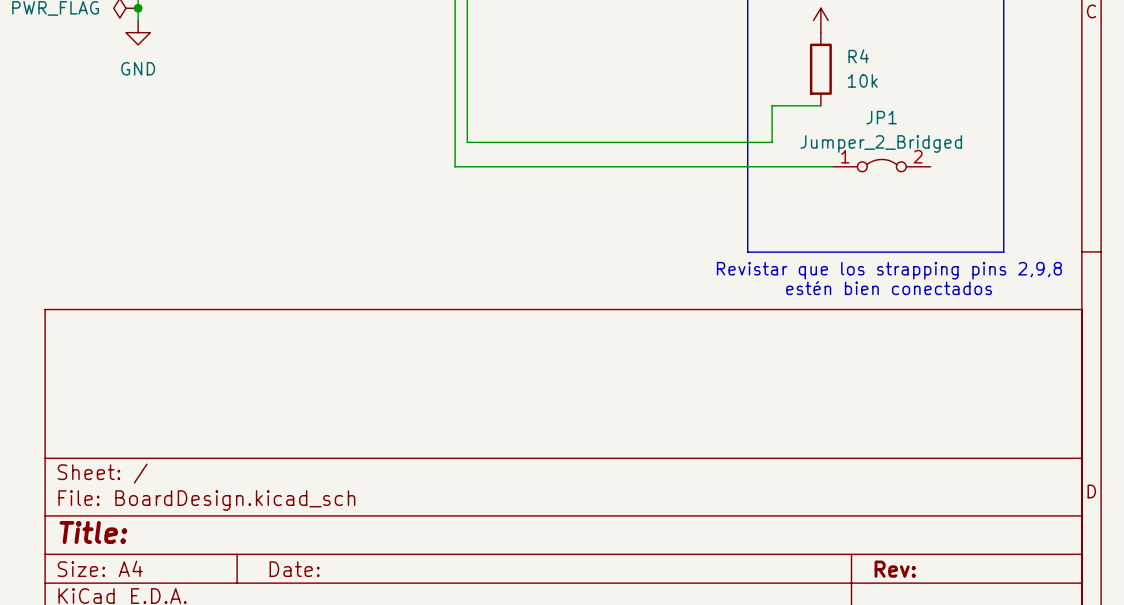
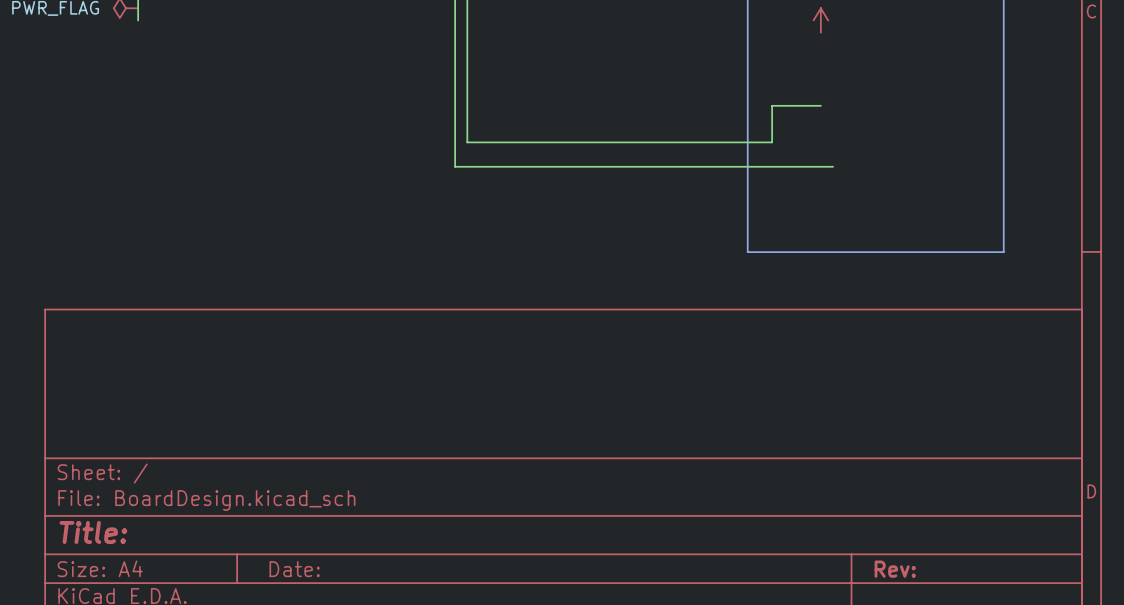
junction: (138, 8) -> none
power symbol: GND (138, 32) -> none
R4: 10k (820, 69) -> none
JP1: Jumper_2_Bridged (881, 165) -> none
text: Revistar que los strapping pins 2,9,8 (889, 270) -> none
text: estén bien conectados (889, 288) -> none

